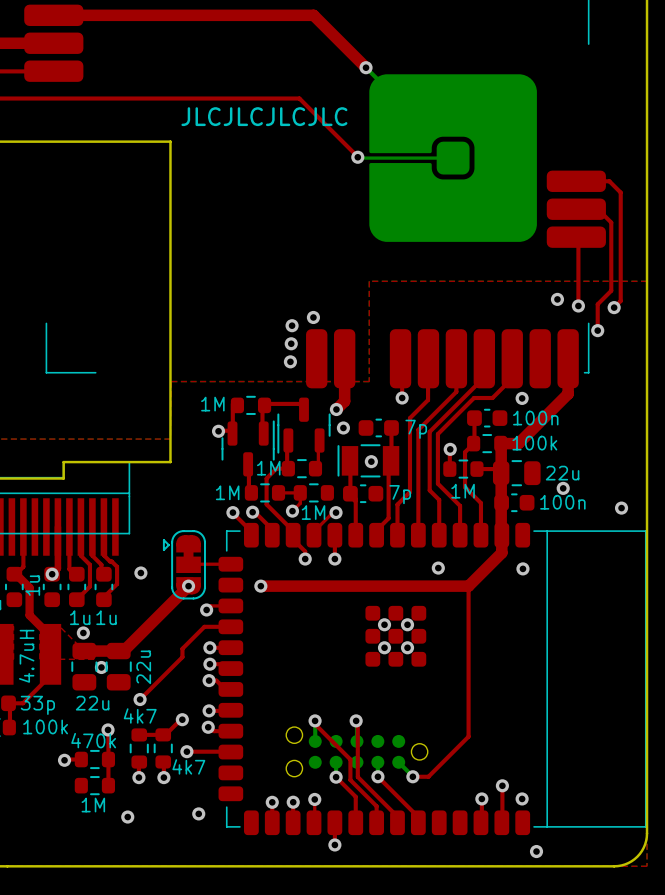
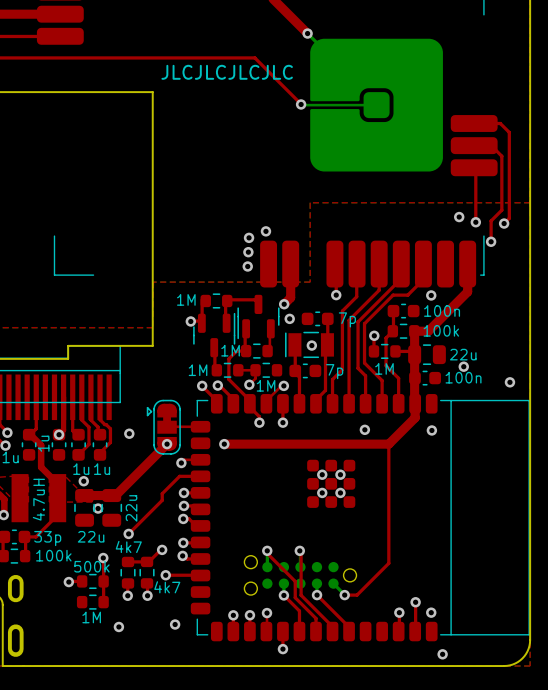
part value: 470k (93, 740) -> 500k (91, 566)

